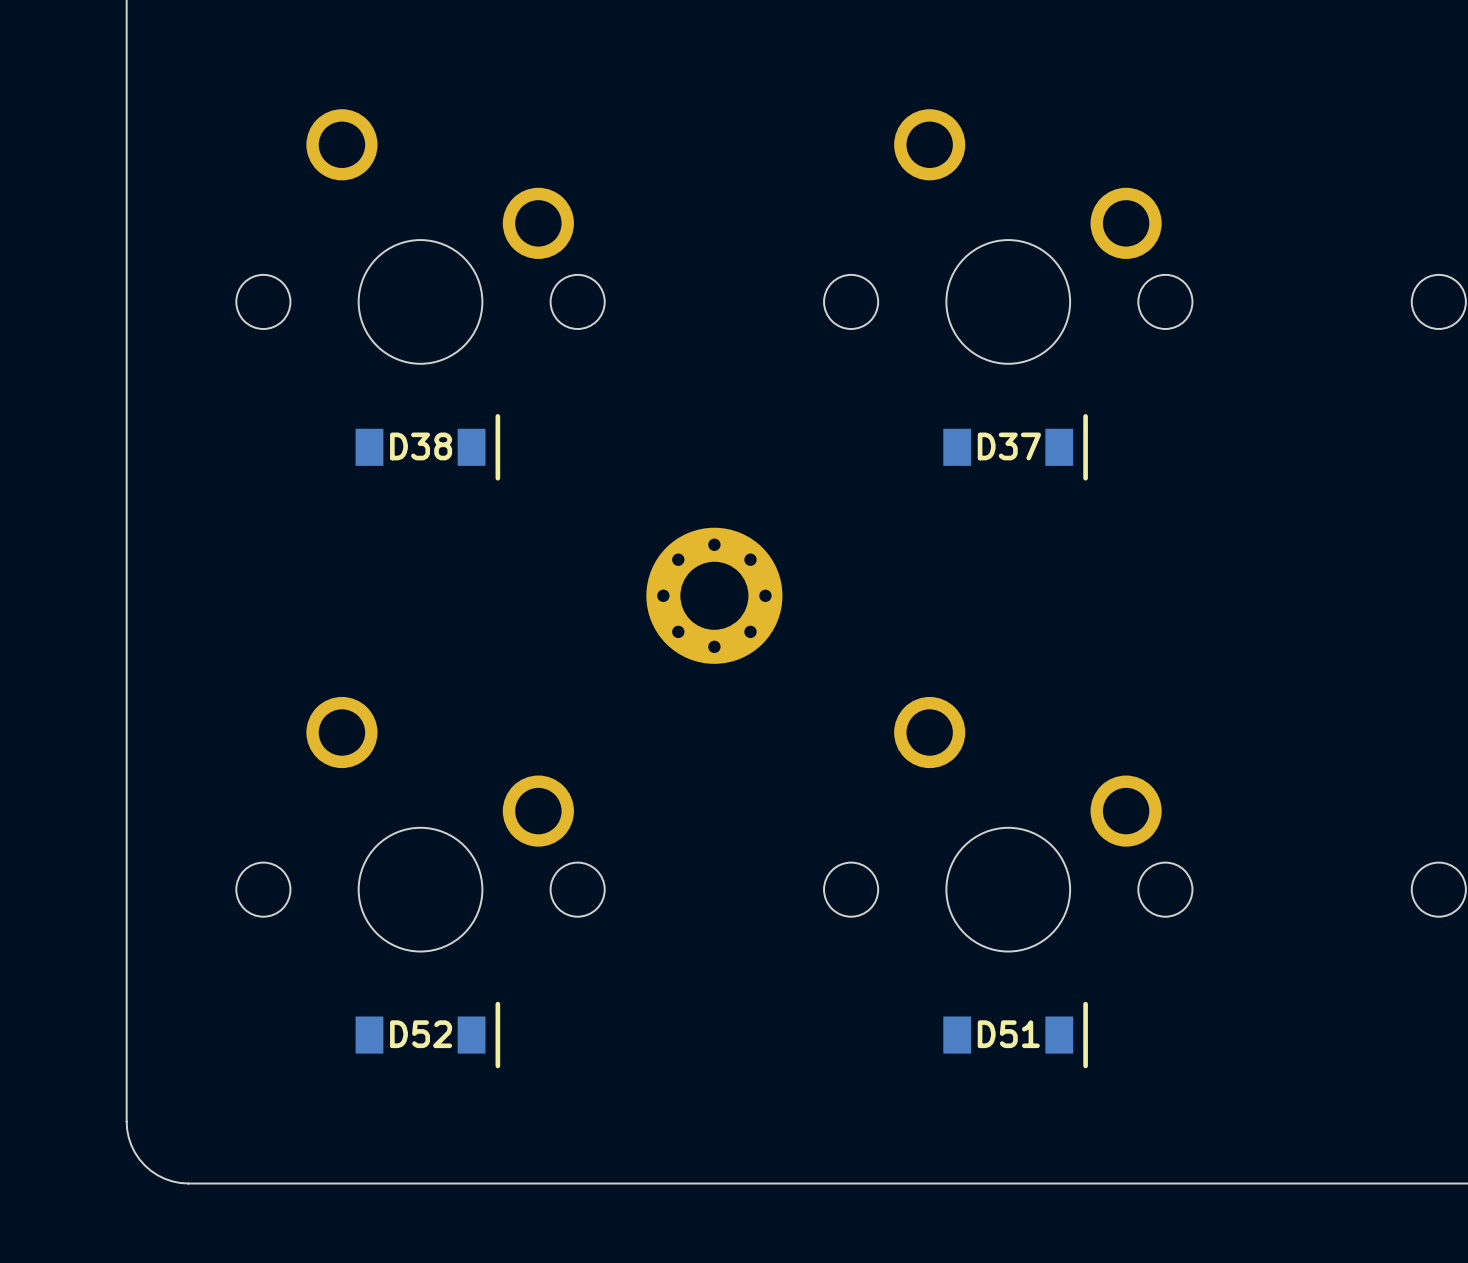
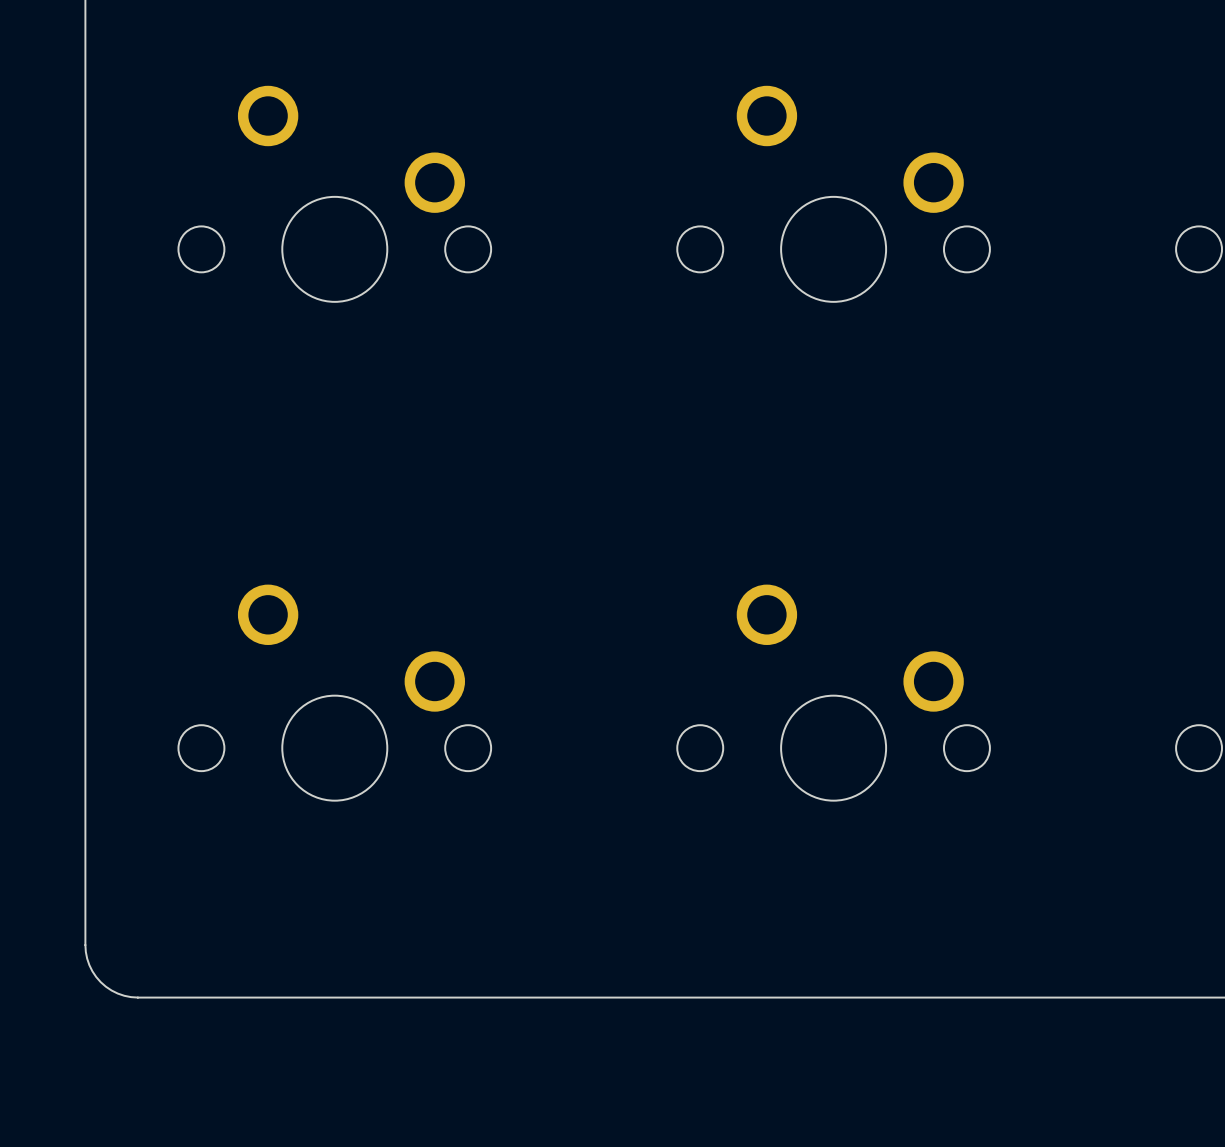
D38: (427, 447) -> none
D37: (1015, 447) -> none
part: (714, 595) -> none
D52: (427, 1035) -> none
D51: (1015, 1035) -> none

